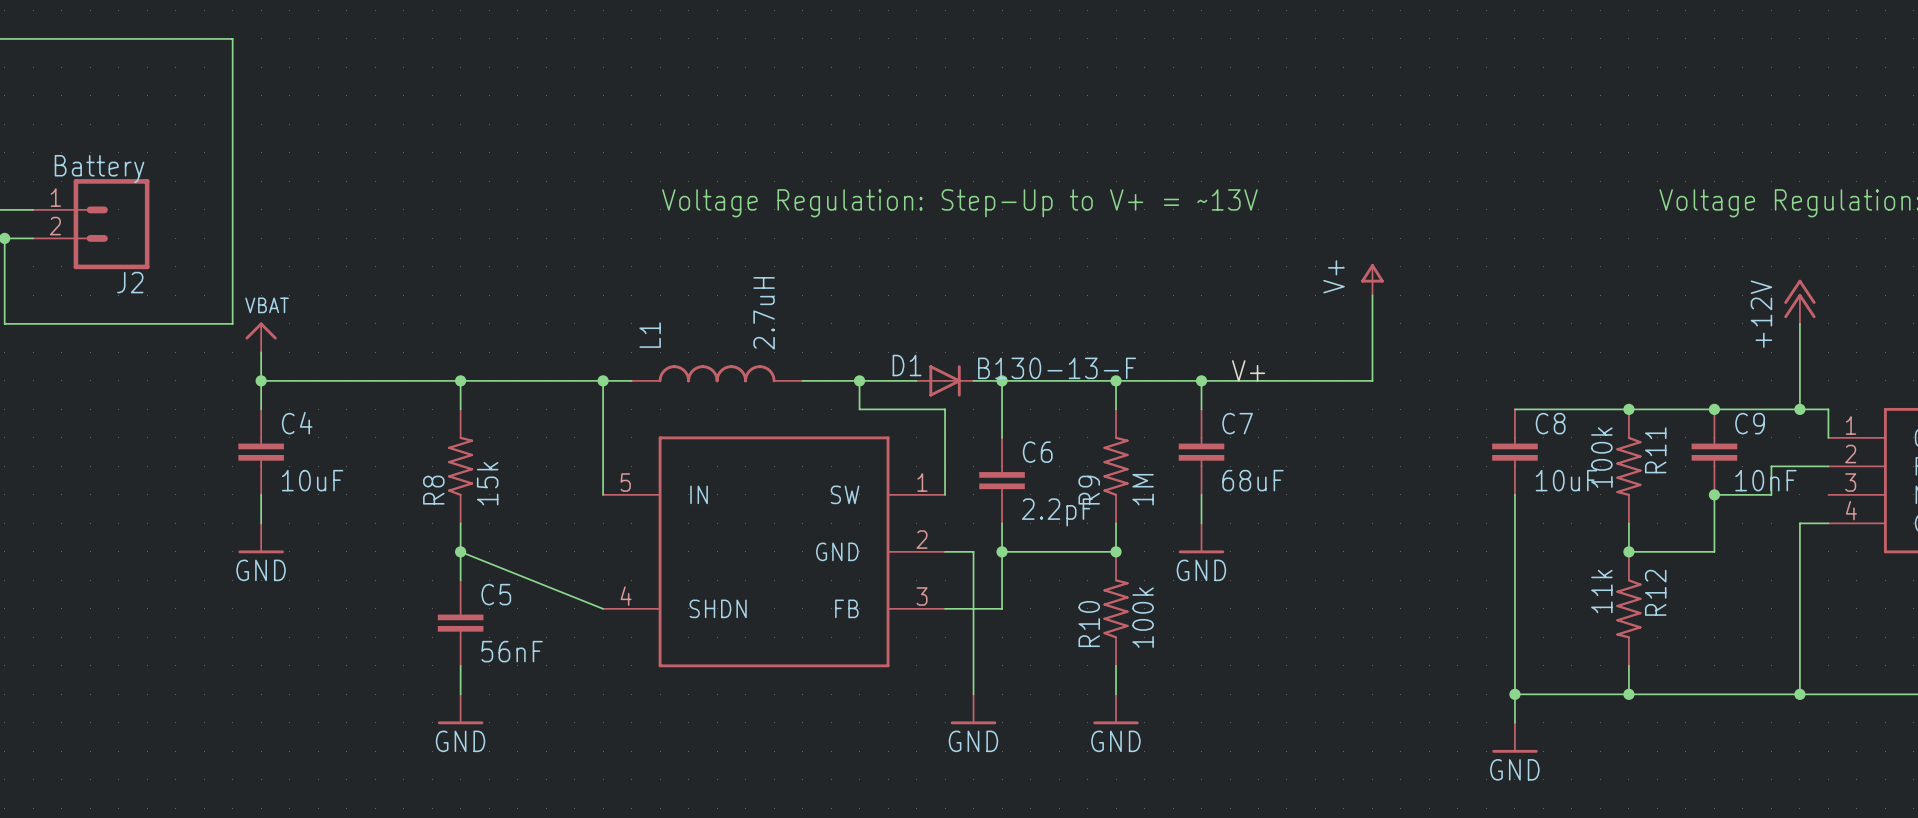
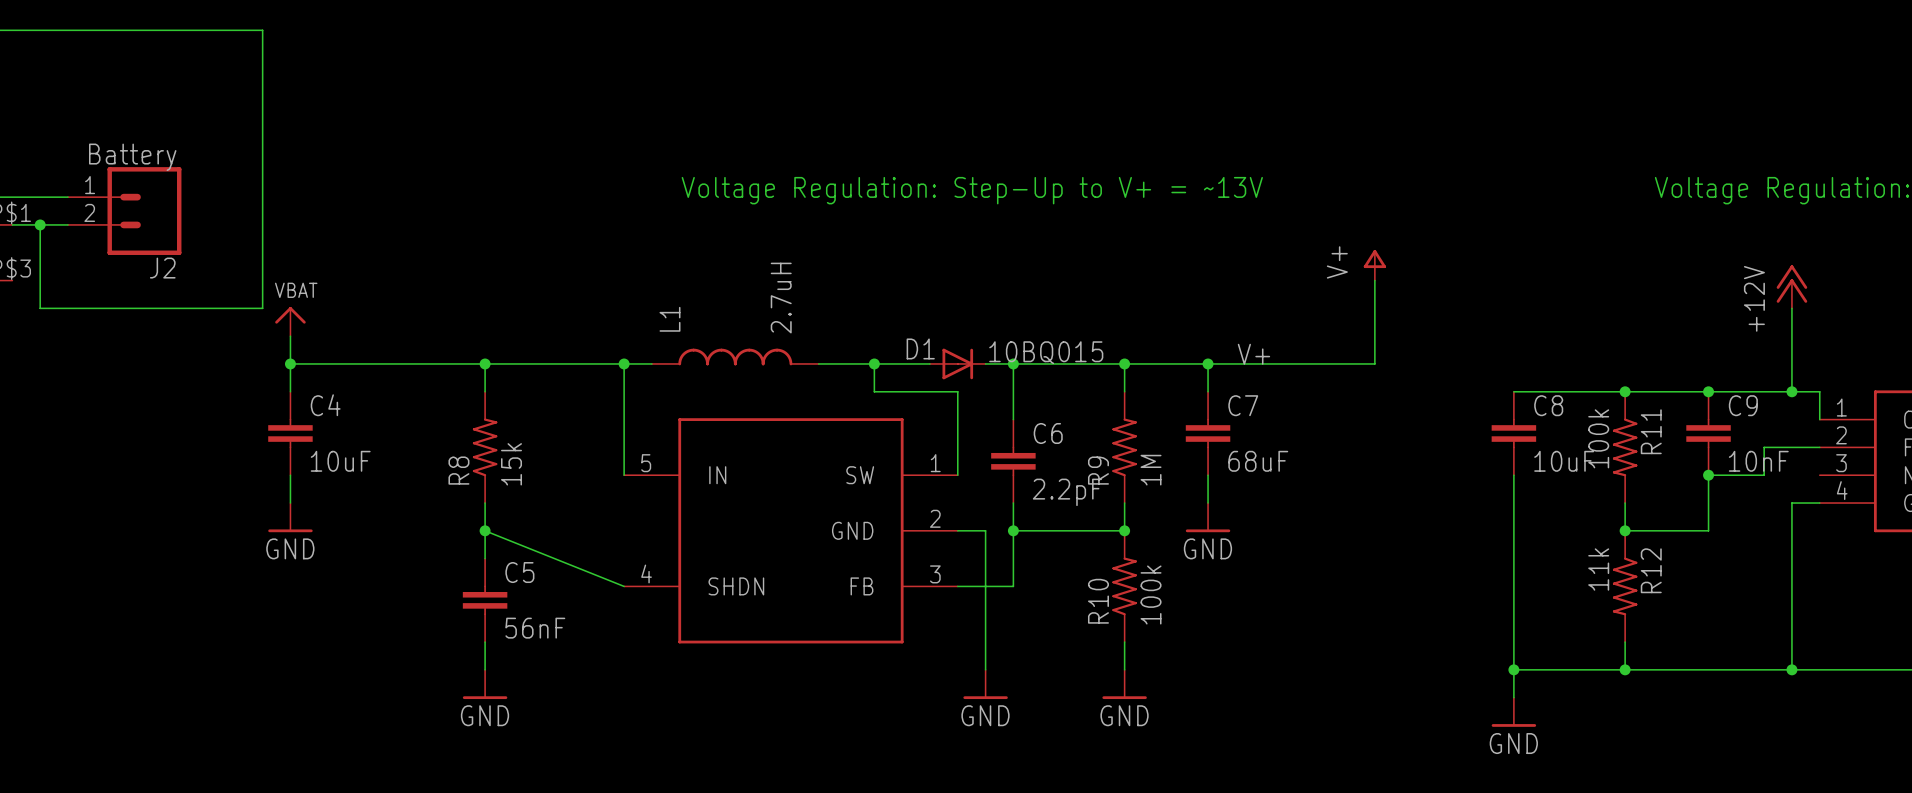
D1 value: B130-13-F (1057, 368) -> 10BQ015 (1046, 352)

